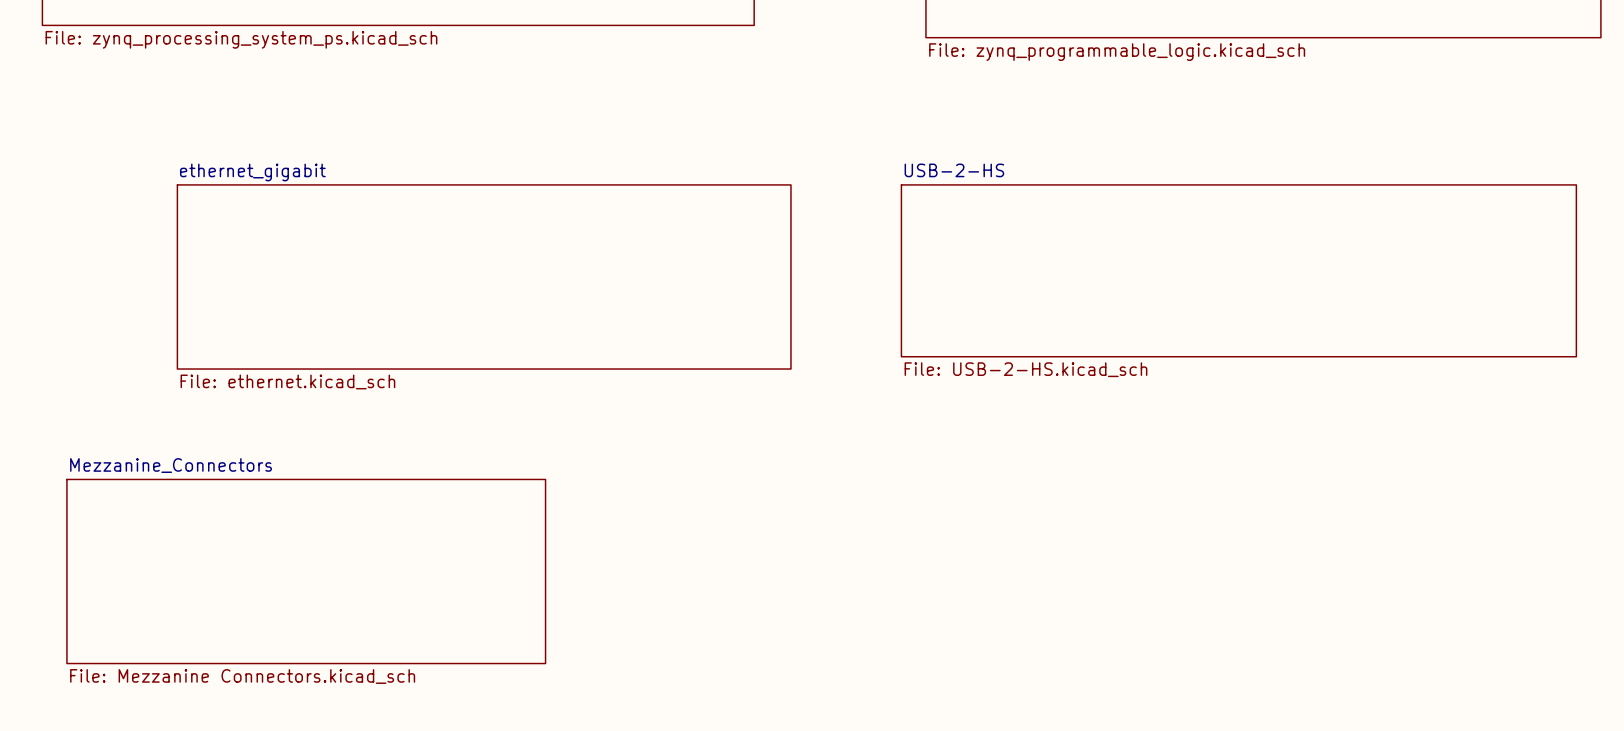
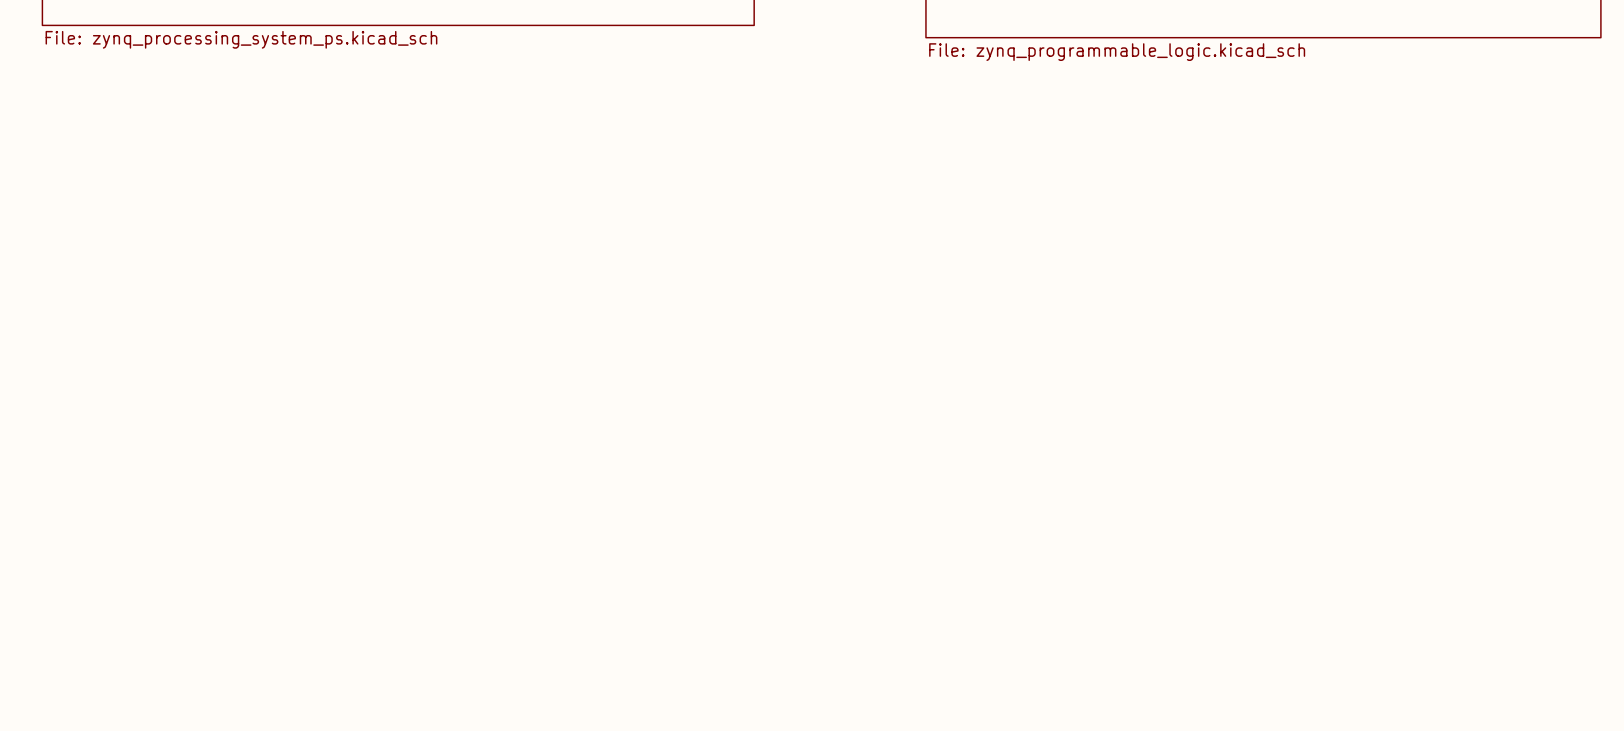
sheet USB-2-HS: File: USB-2-HS.kicad_sch (1238, 270) -> none
sheet ethernet_gigabit: File: ethernet.kicad_sch (484, 276) -> none
sheet Mezzanine_Connectors: File: Mezzanine Connectors.kicad_sch (306, 571) -> none

